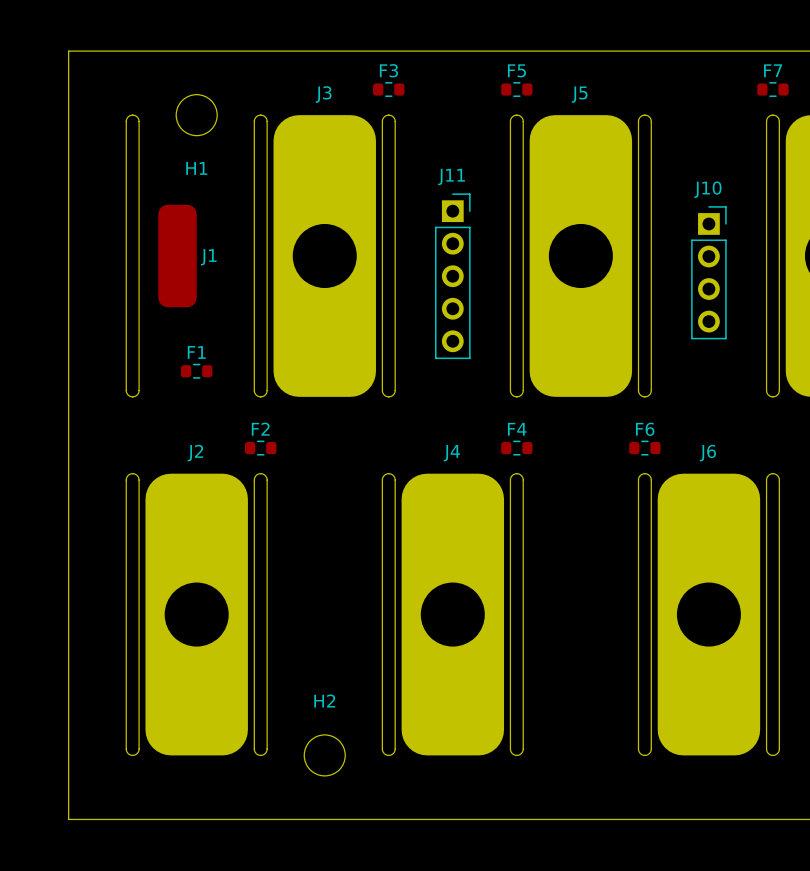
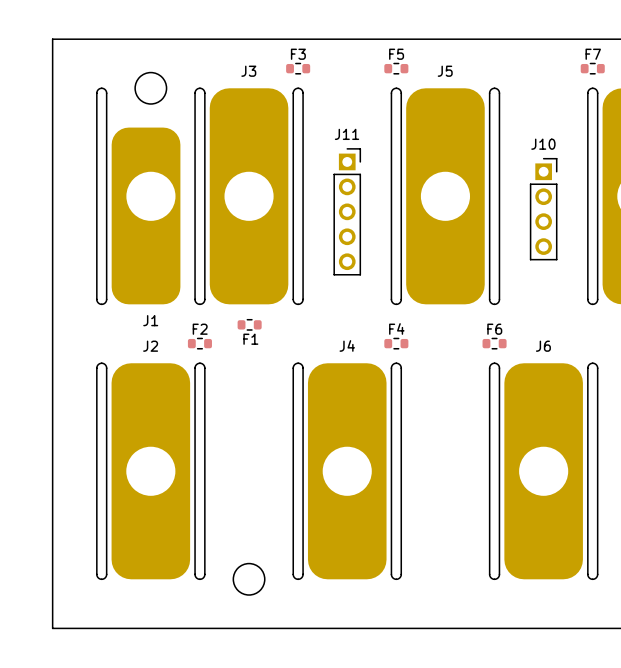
H1 name: H1 (196, 168) -> none
J1 footprint: [158, 204, 197, 308] -> [111, 127, 181, 305]
J1 name position: J1 (208, 257) -> J1 (150, 320)
F1 name position: F1 (196, 352) -> F1 (250, 339)
F1 position: (196, 371) -> (249, 324)
H2 name: H2 (324, 701) -> none

